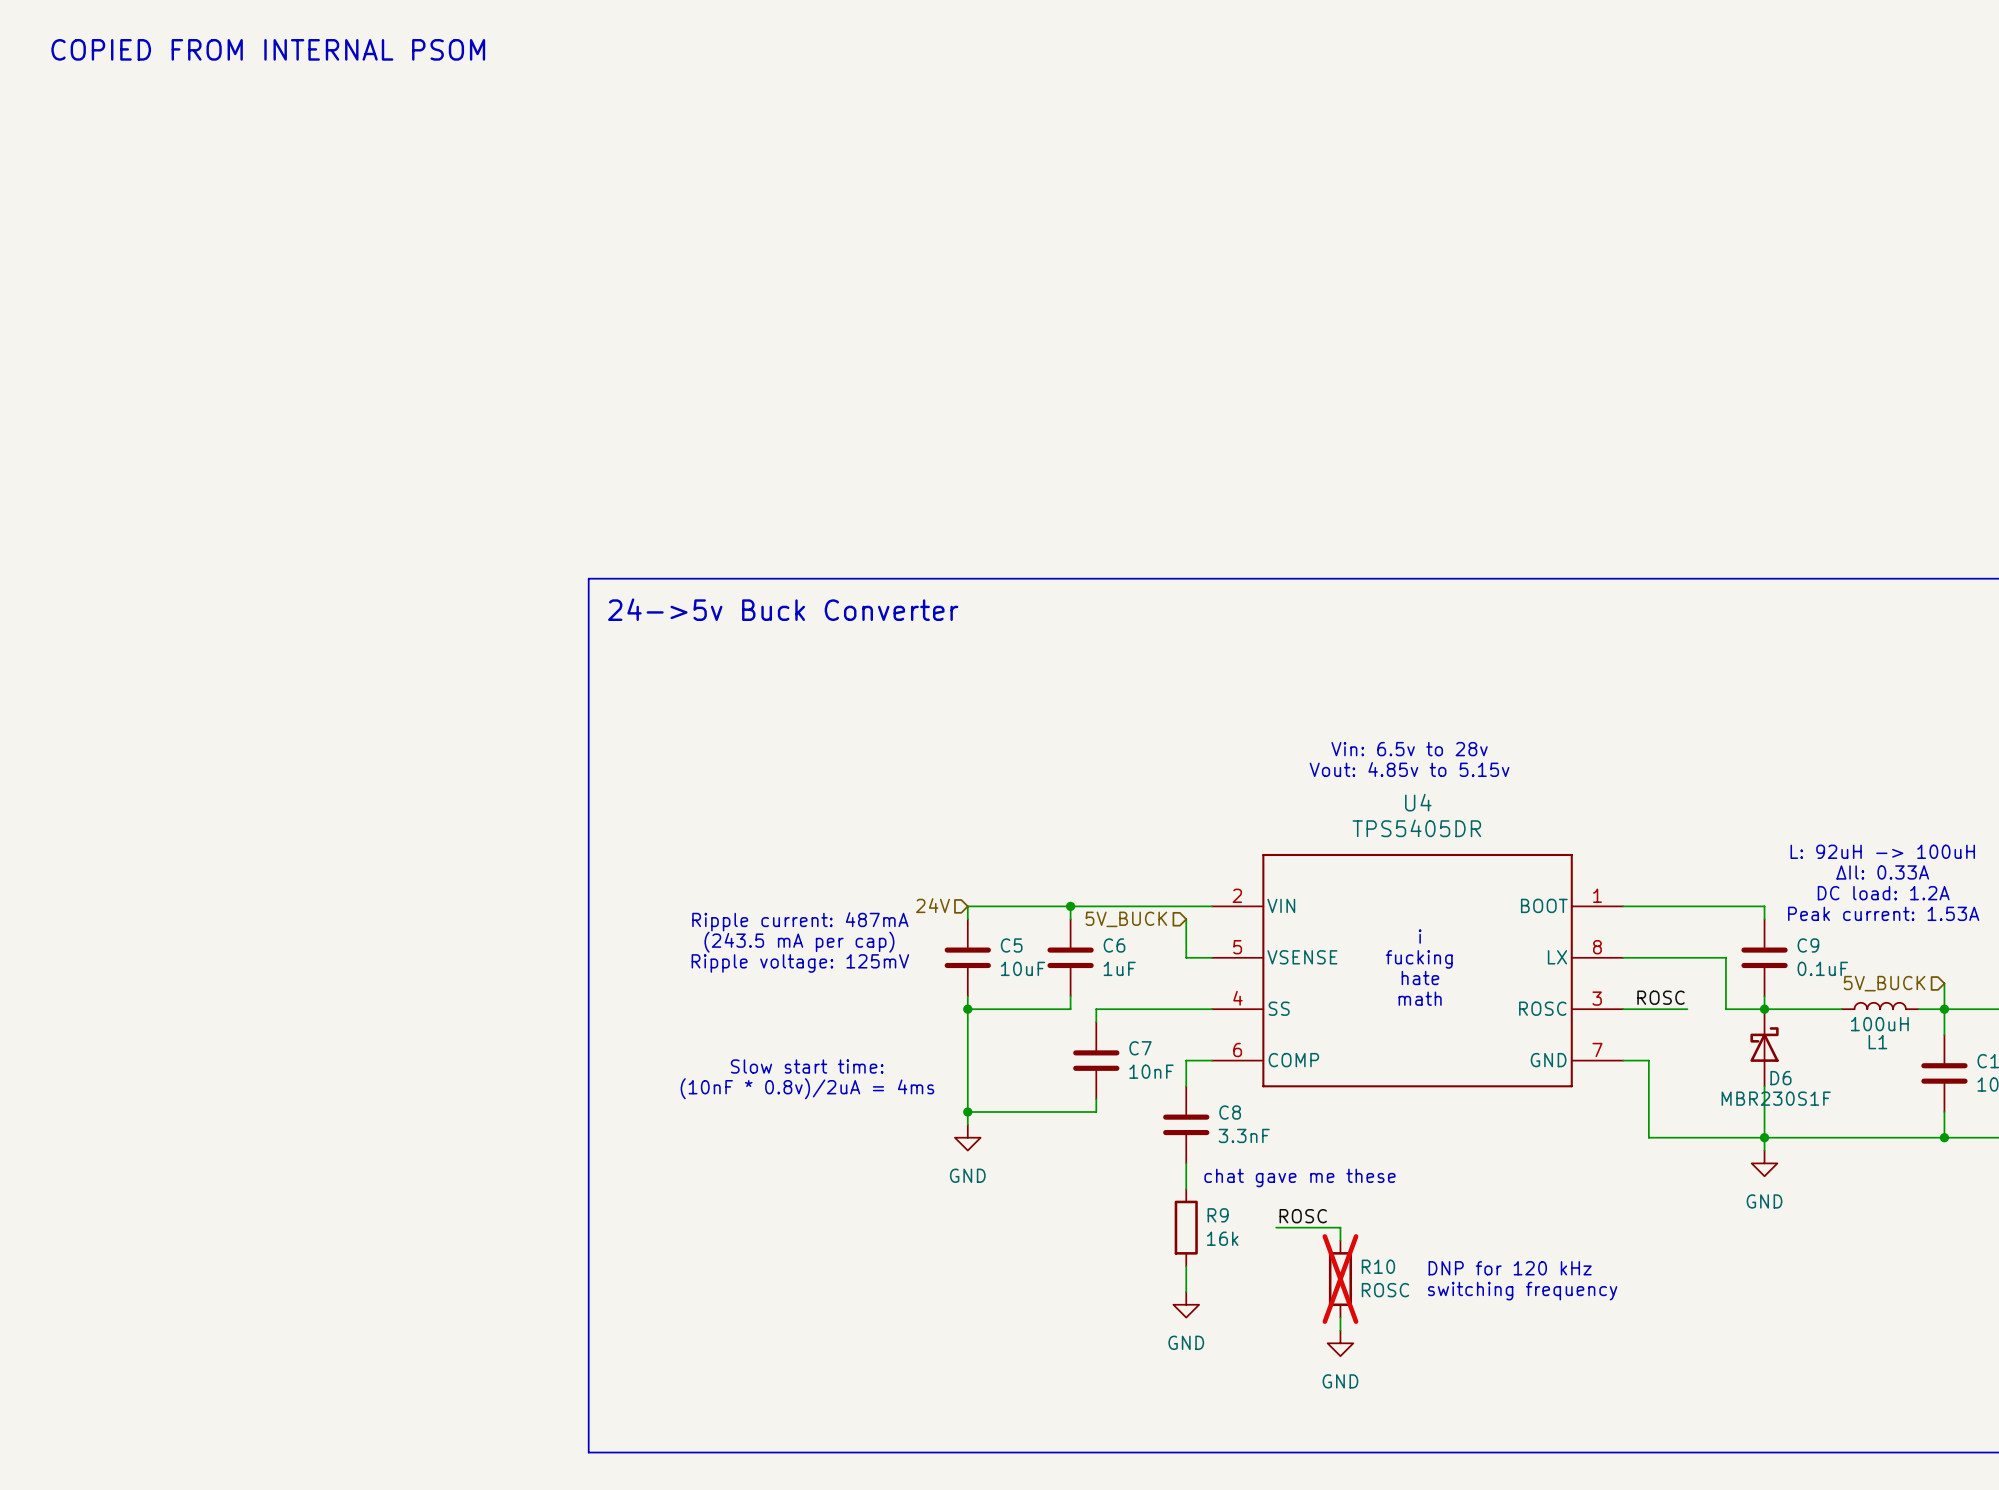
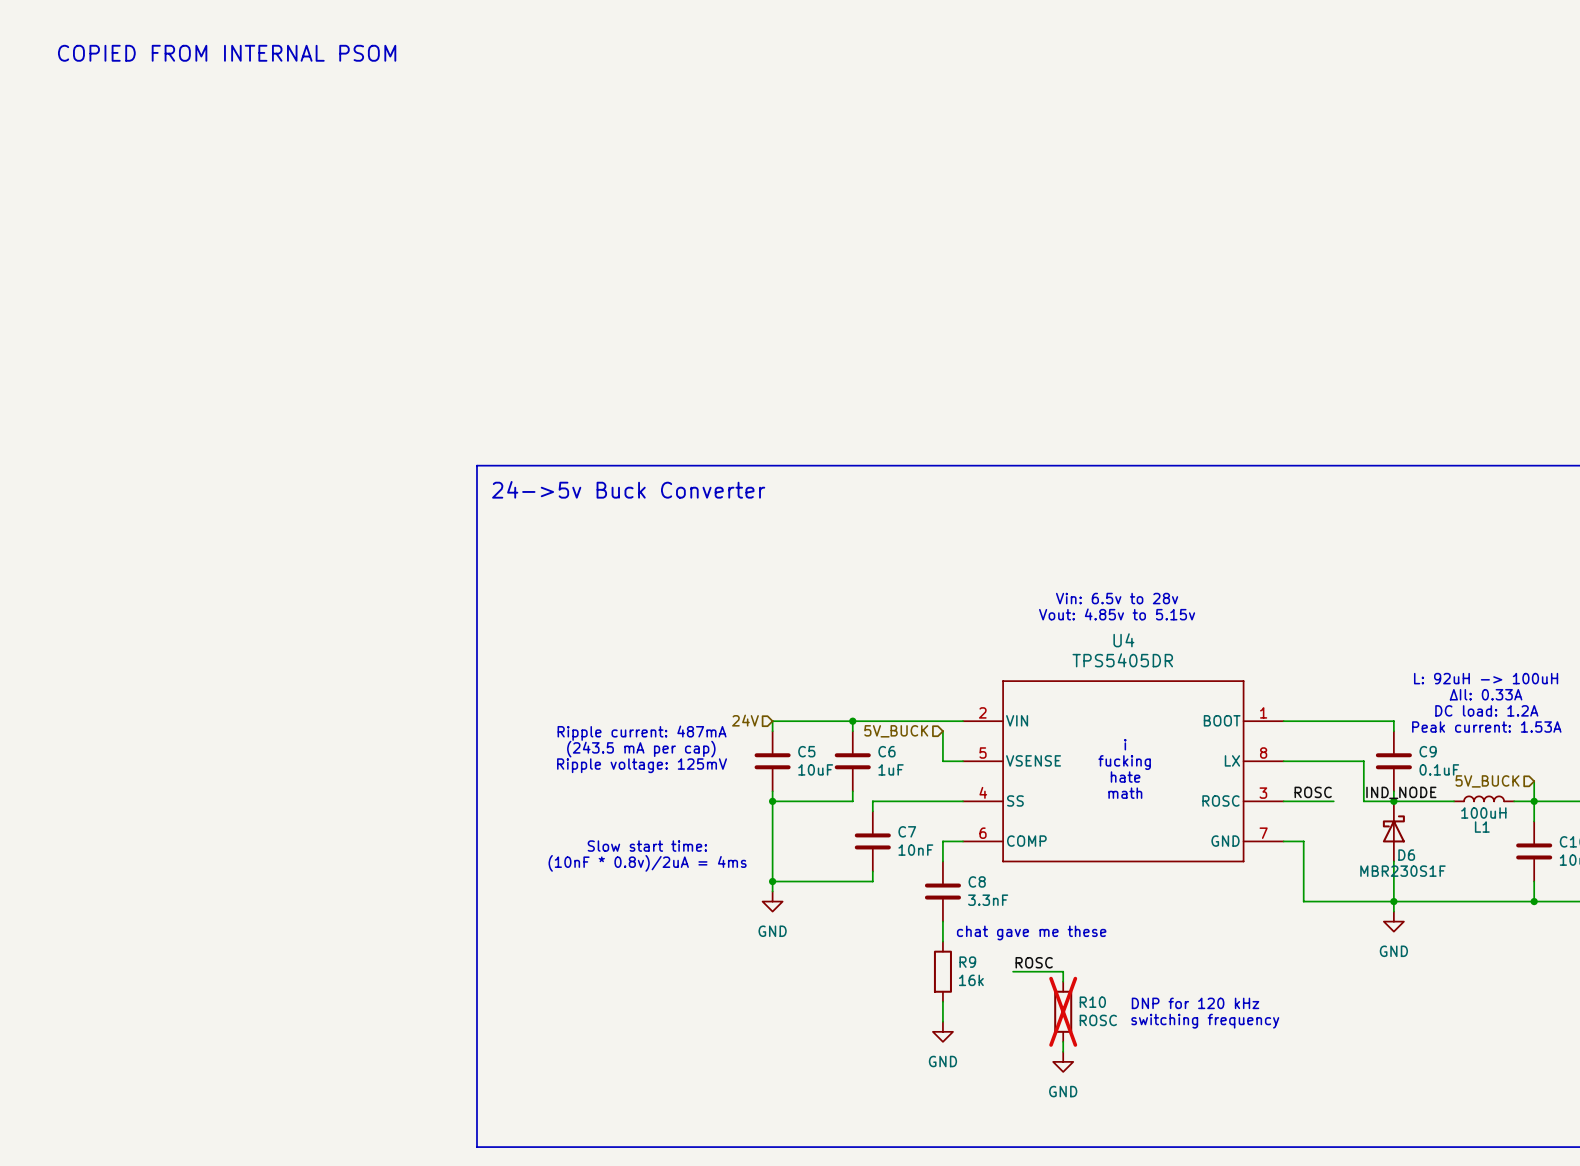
label: none -> IND_NODE (1401, 792)

